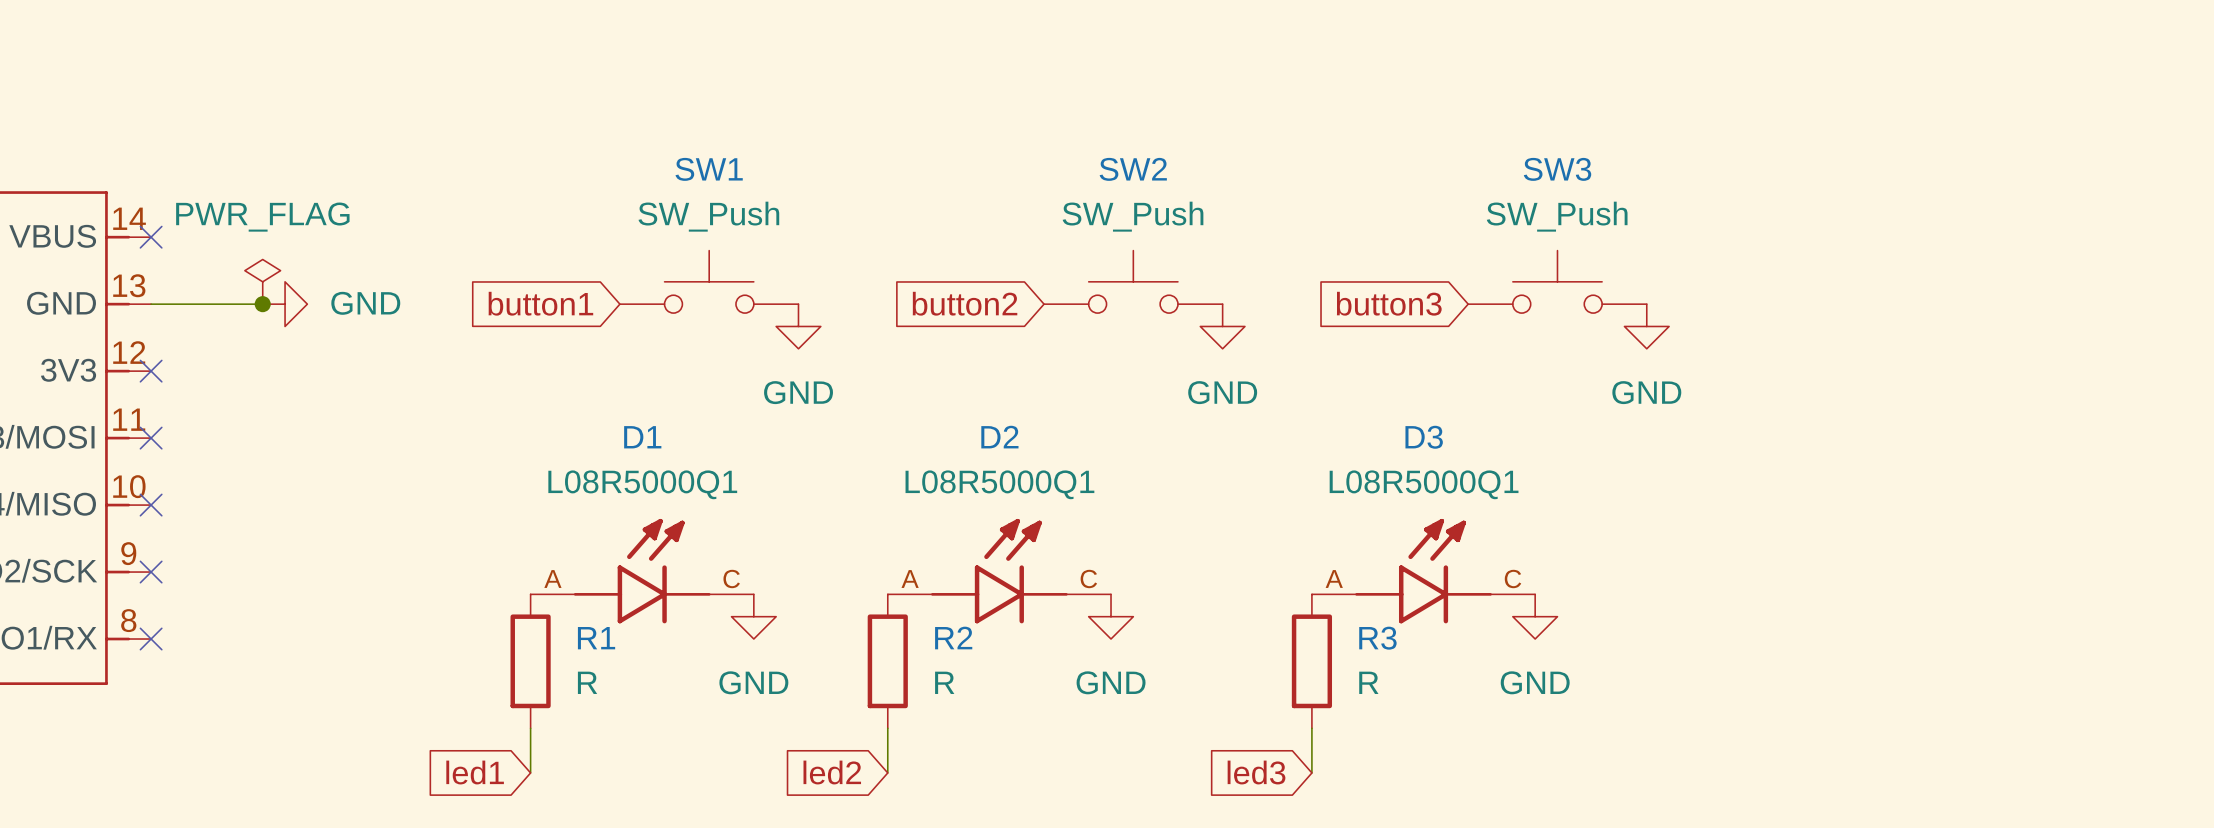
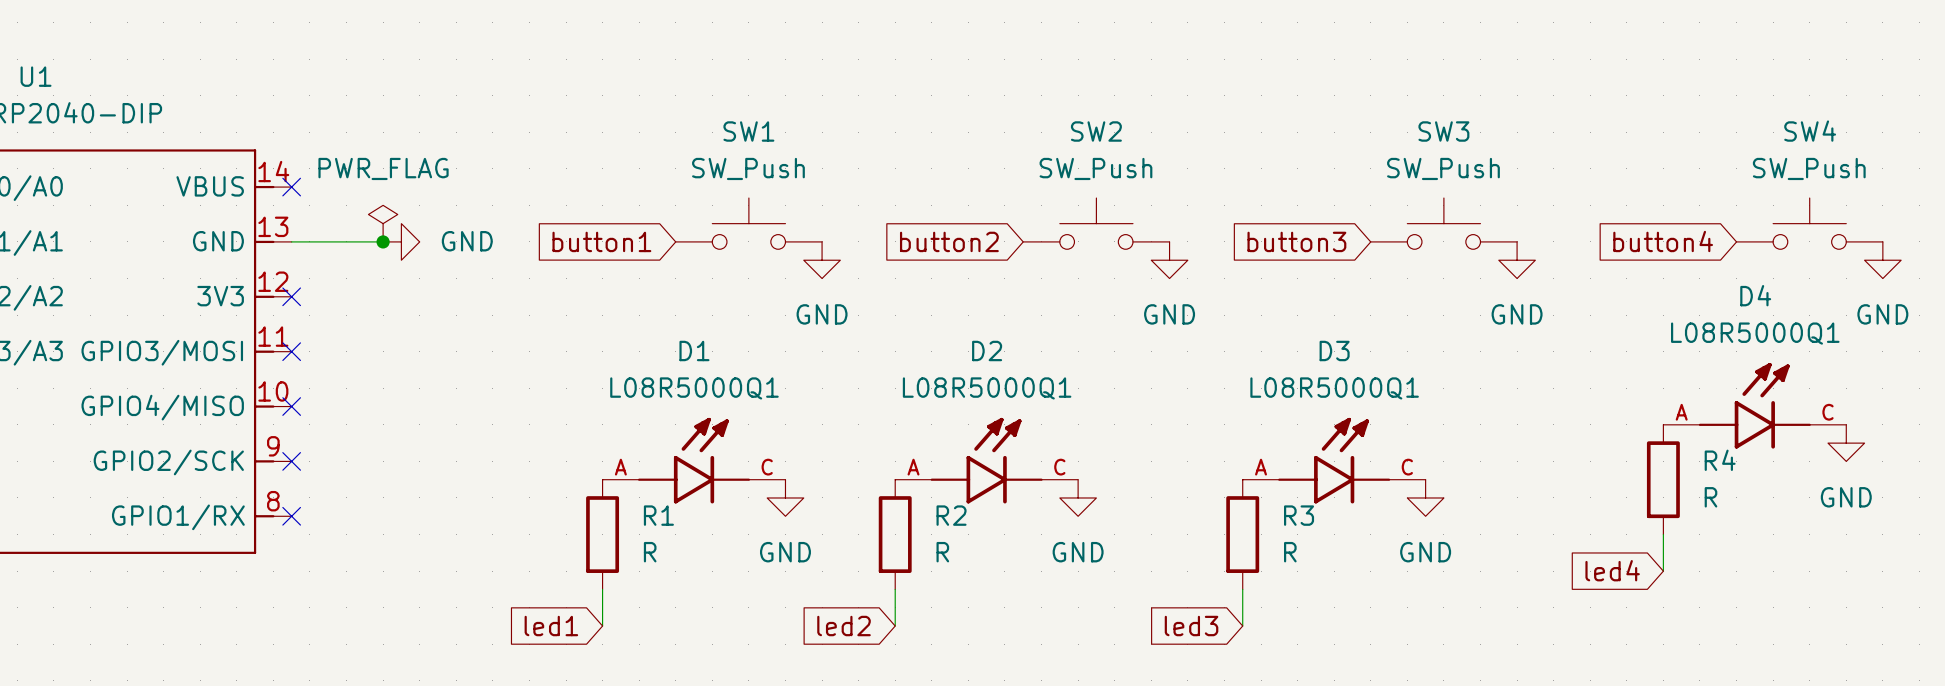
SW4: none -> SW_Push (1809, 223)
global label: none -> button4 (1663, 241)
power symbol: none -> GND (1882, 260)
D4: none -> L08R5000Q1 (1754, 405)
power symbol: none -> GND (1846, 443)
R4: none -> R (1663, 479)
wire: none -> (1663, 534) (1663, 571)
global label: none -> led4 (1612, 570)

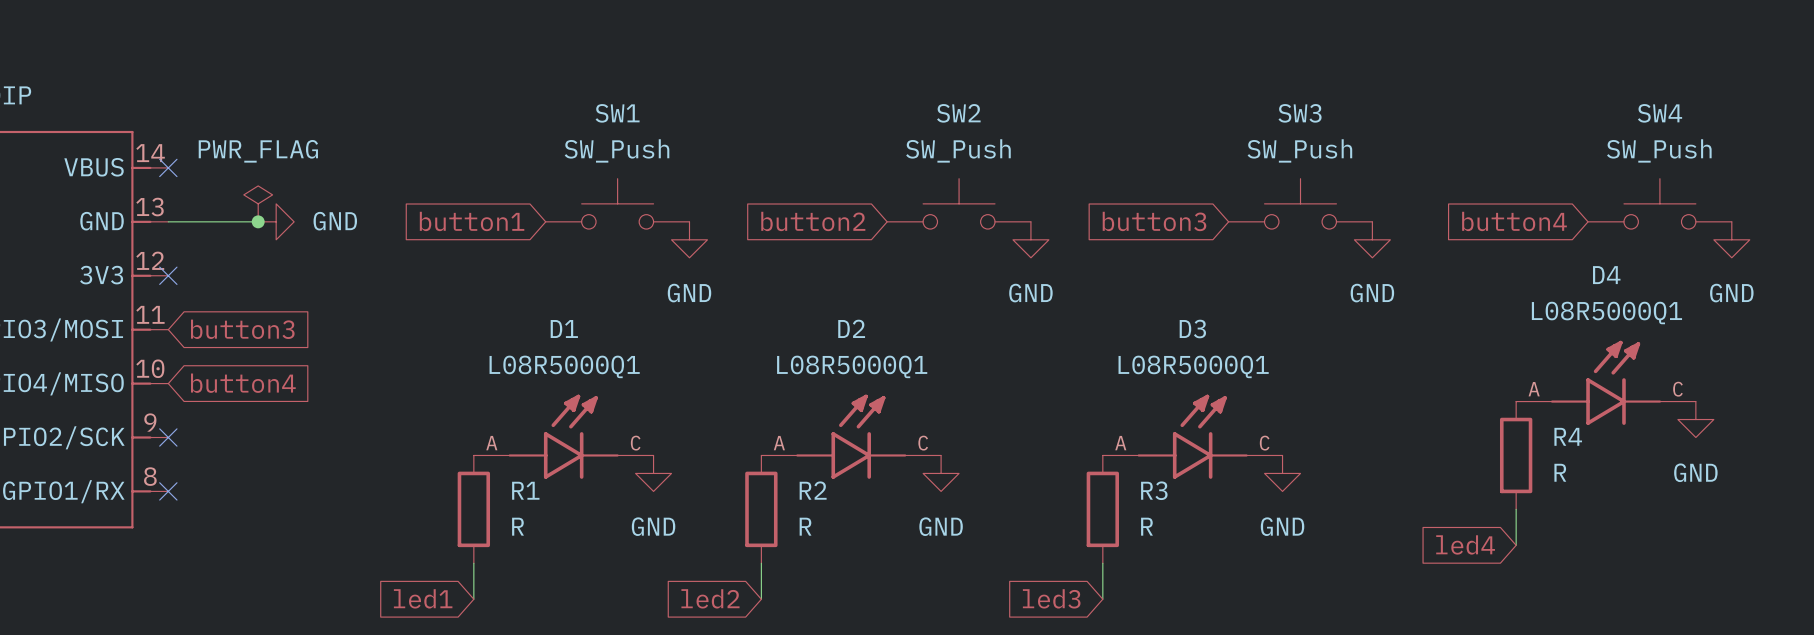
no-connect mark: (291, 351) -> none
global label: none -> button3 (242, 329)
no-connect mark: (291, 406) -> none
global label: none -> button4 (243, 383)

